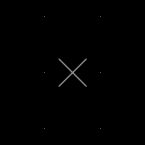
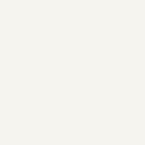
no-connect mark: (72, 72) -> none

